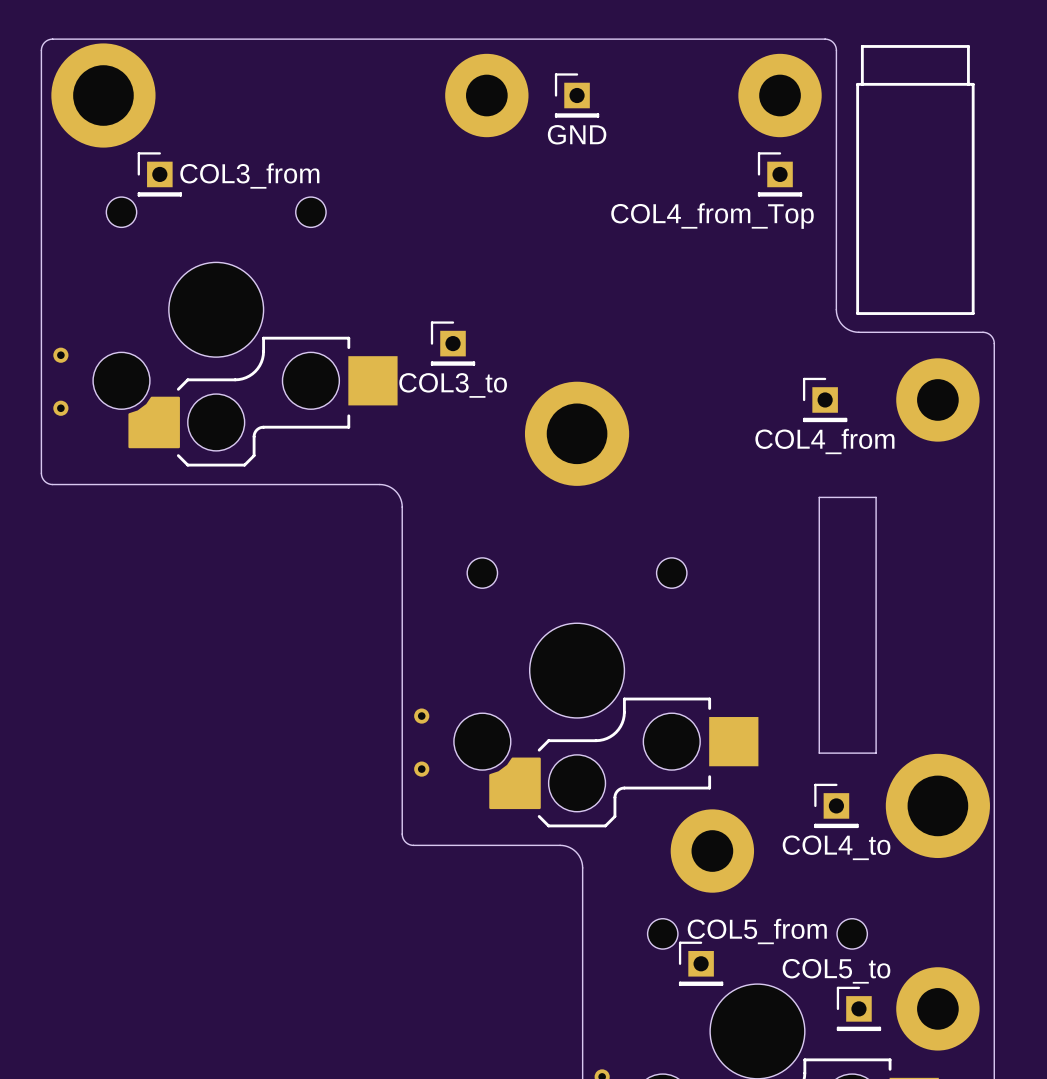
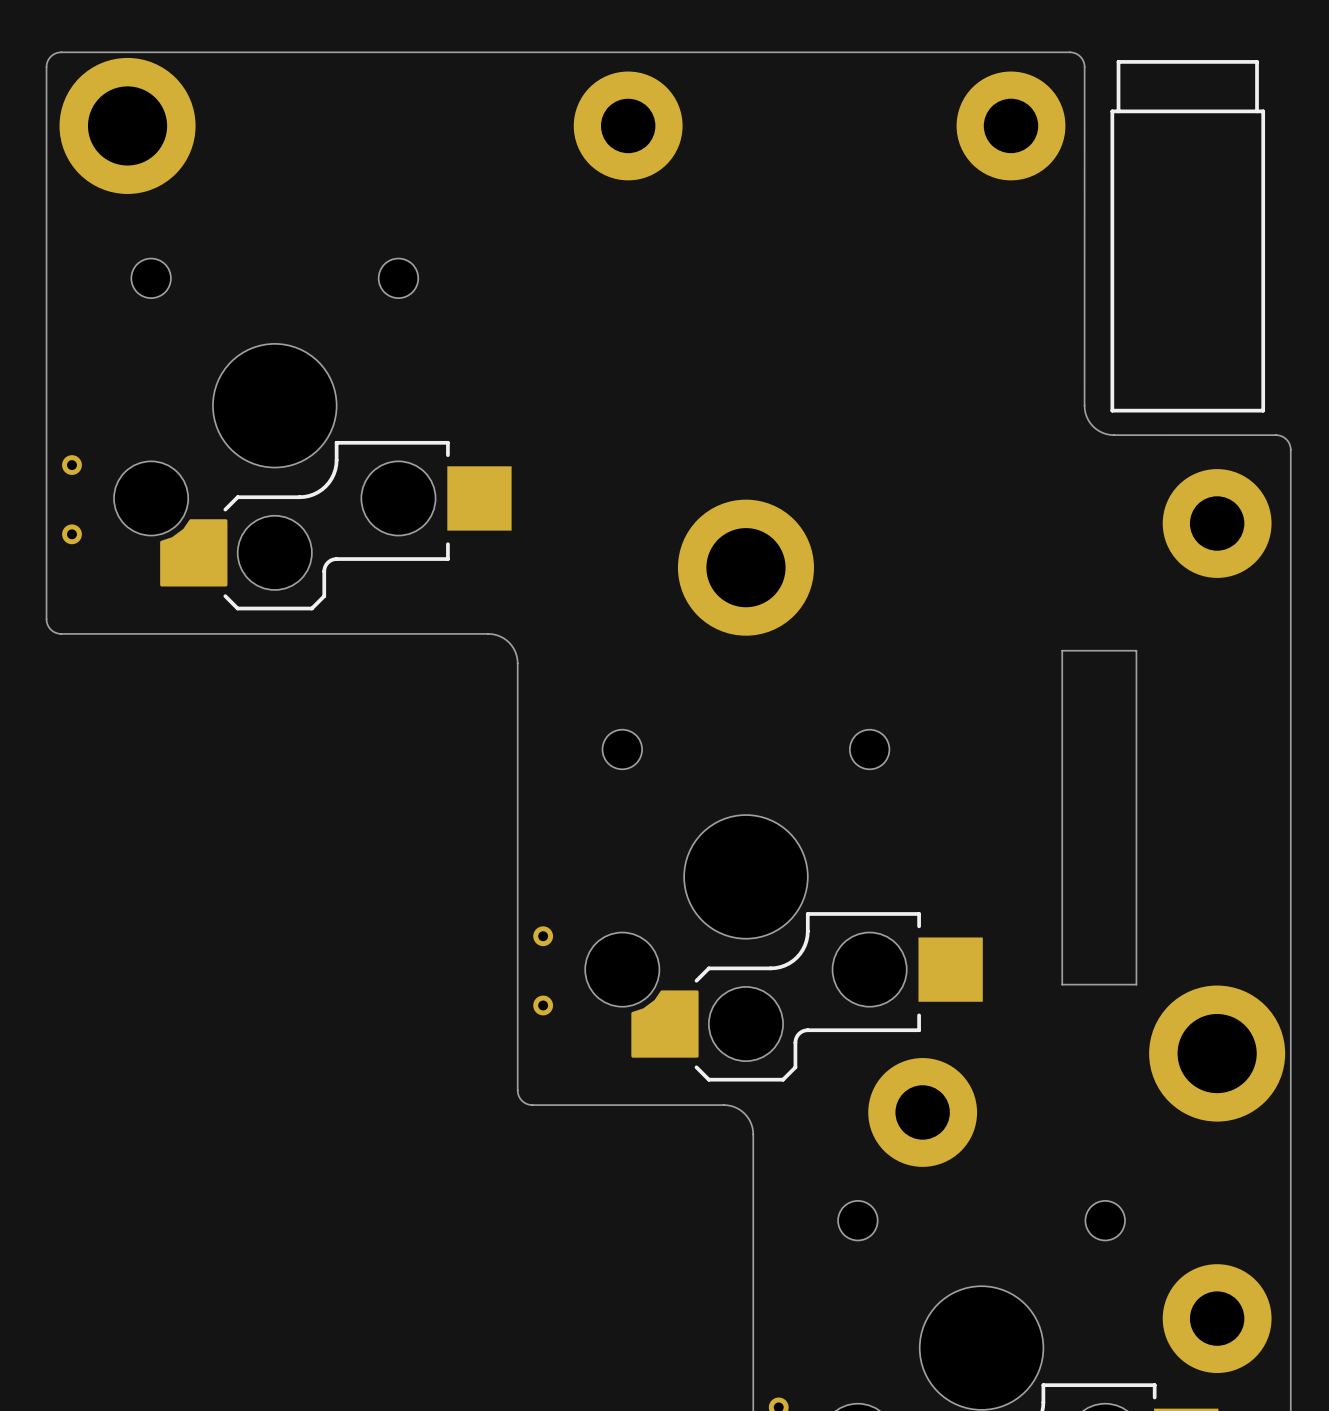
part: GND (577, 95) -> none
part: COL3_from (159, 174) -> none
part: COL4_from_Top (780, 174) -> none
part: COL3_to (453, 343) -> none
part: COL4_from (825, 399) -> none
part: COL4_to (836, 805) -> none
part: COL5_from (701, 963) -> none
part: COL5_to (858, 1008) -> none

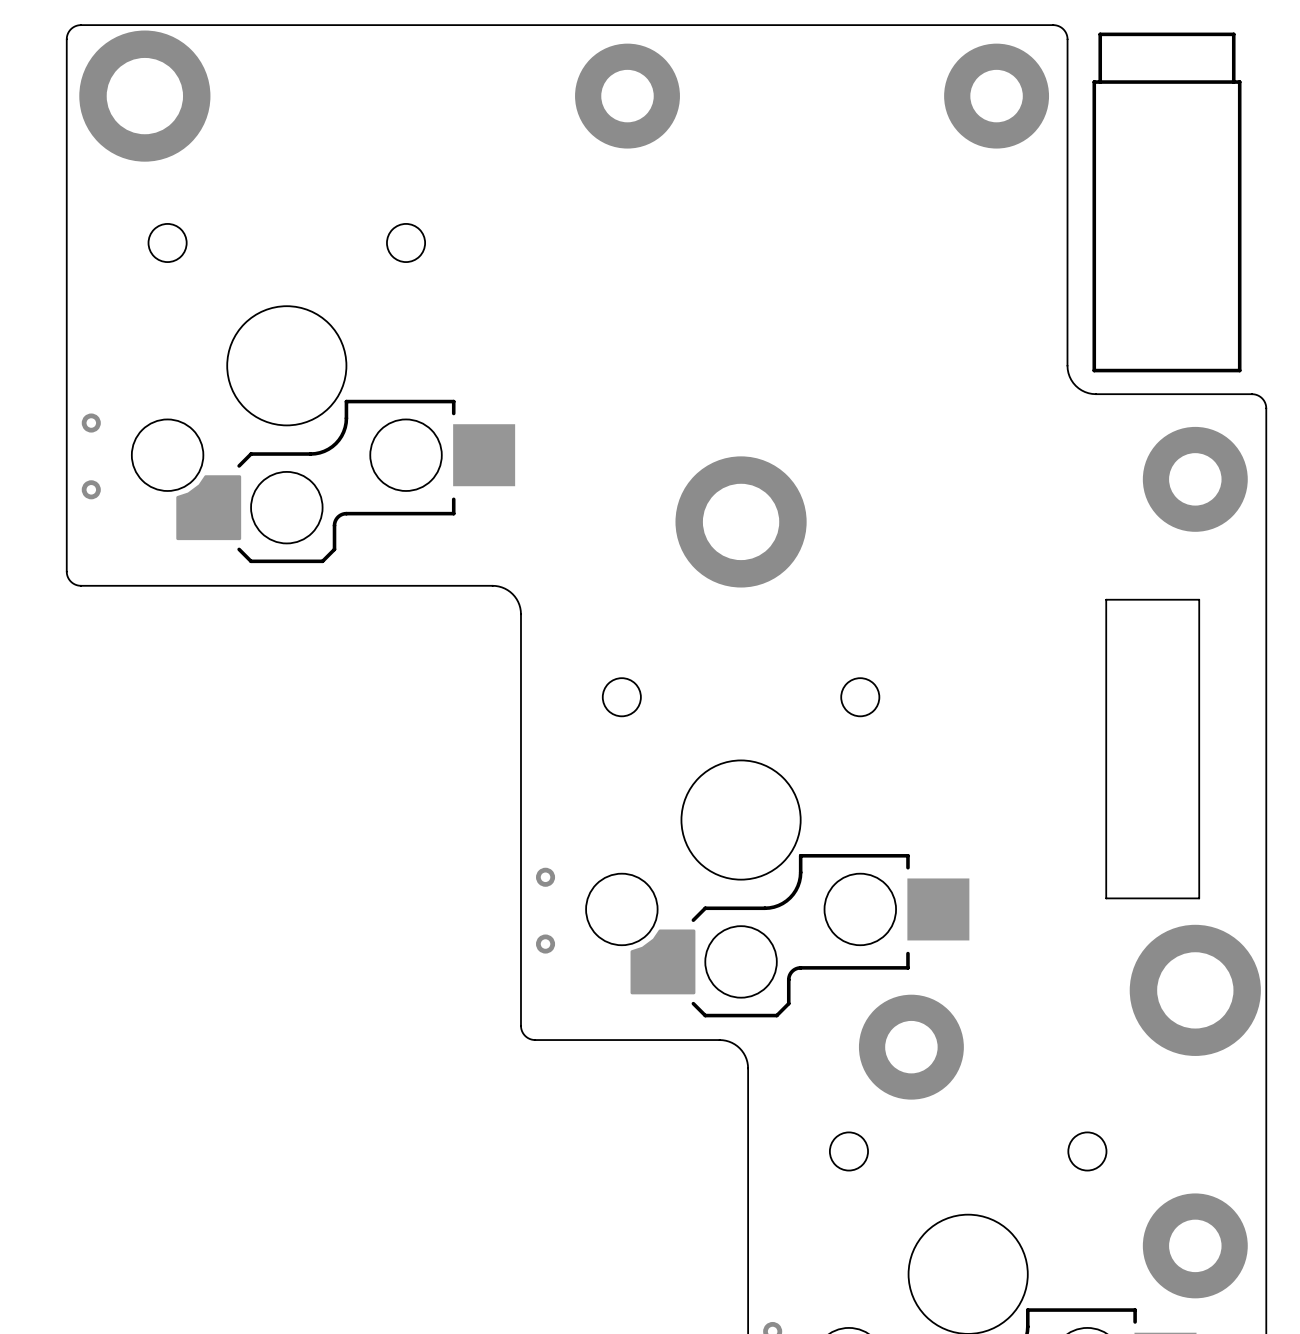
board edge: none -> (1106, 599) (1199, 599) (1199, 898) (1106, 898) (1106, 599)
board edge: (1062, 650) (1136, 650) (1136, 984) (1062, 984) (1062, 650) -> none

